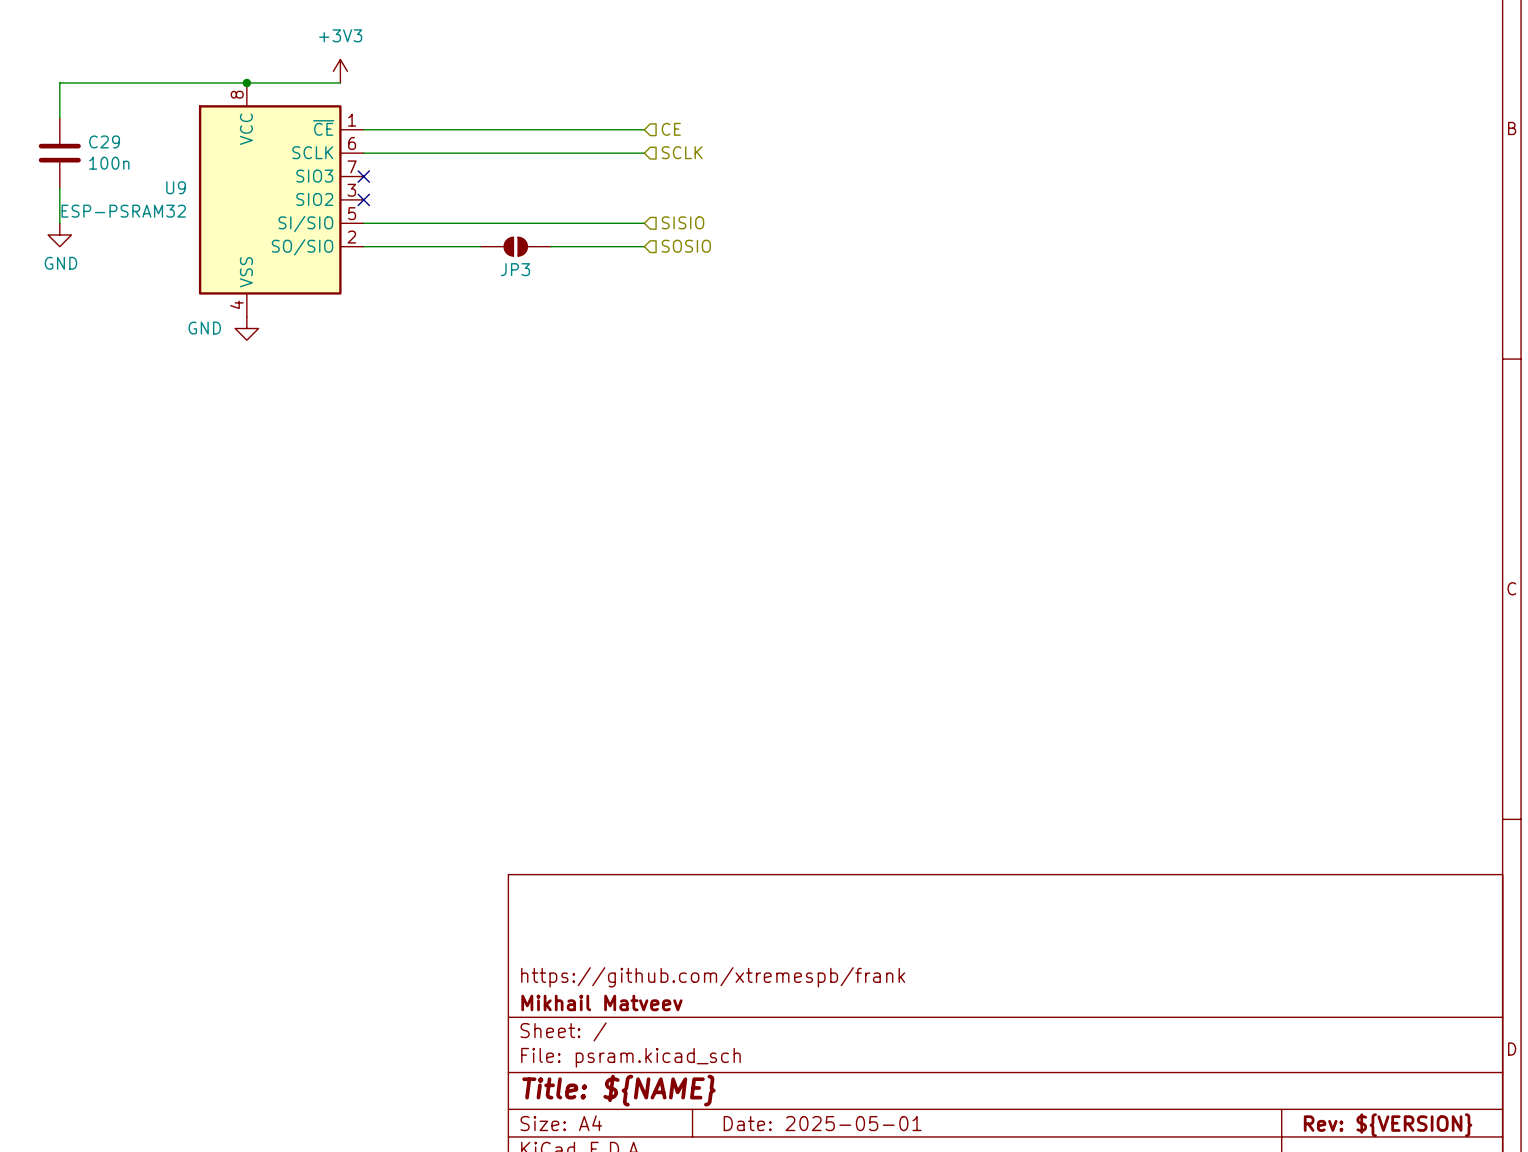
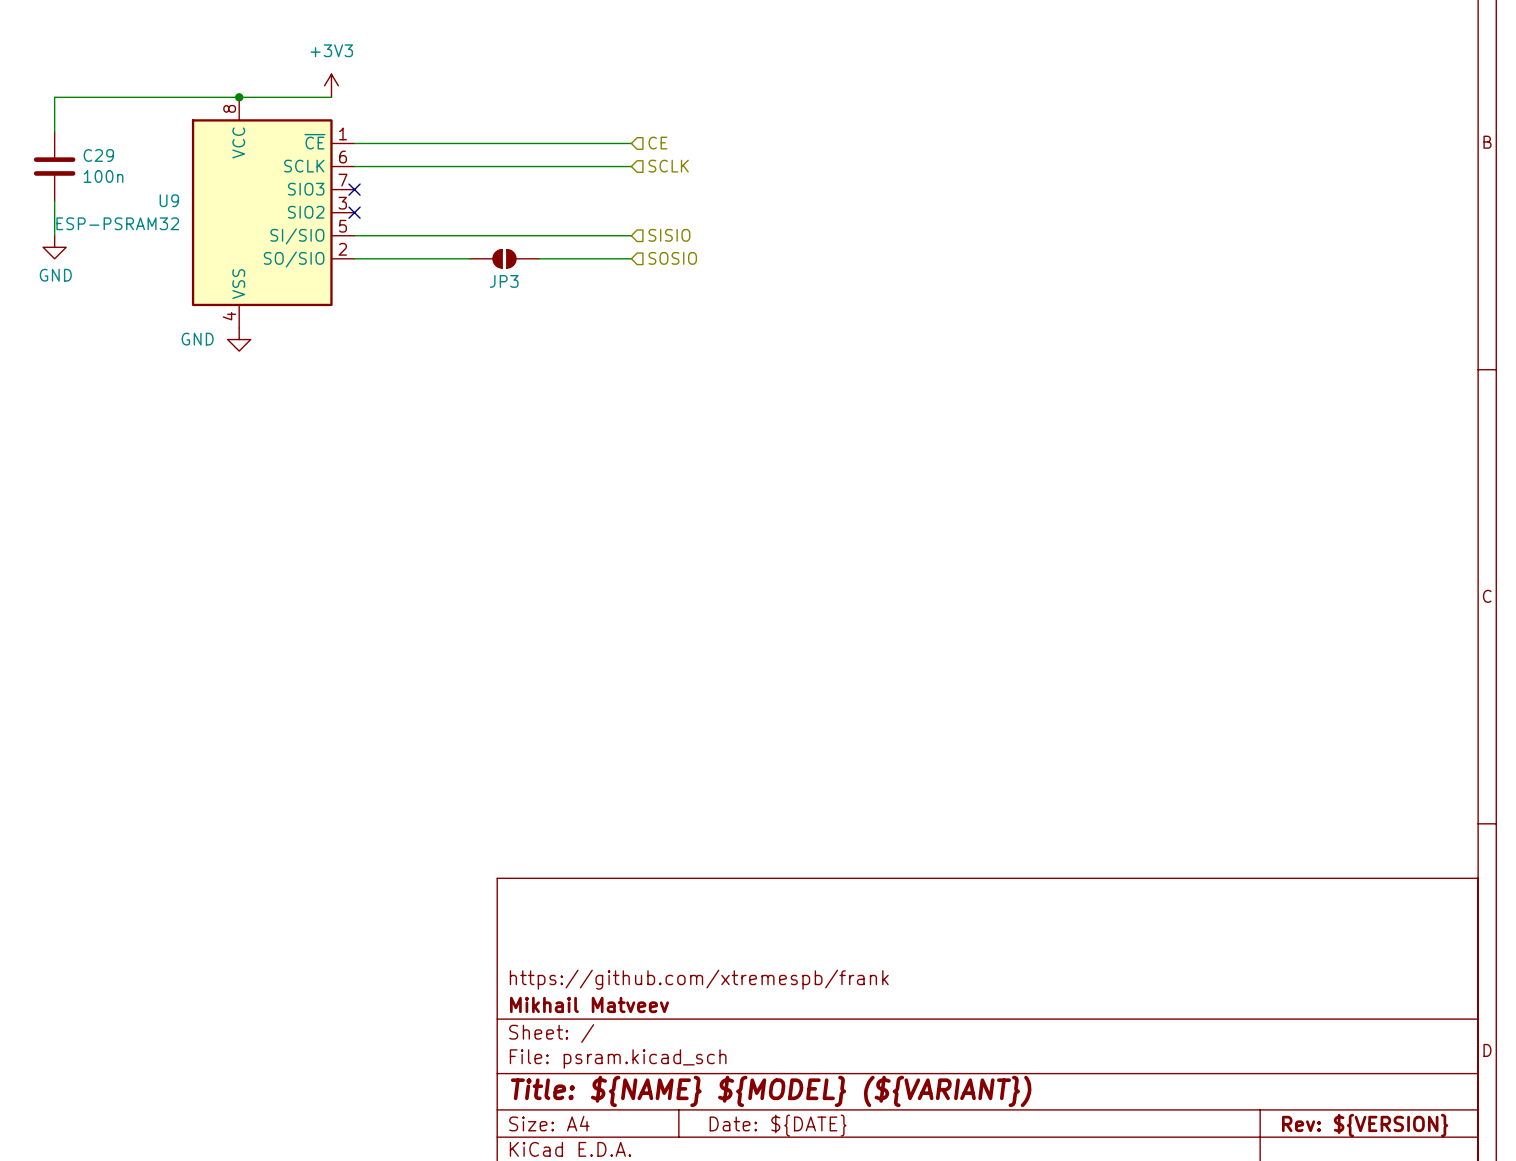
title block: Title: ${NAME} (618, 1090) -> Title: ${NAME} ${MODEL} (${VARIANT}) (771, 1091)
title block: Date: 2025-05-01 (822, 1123) -> Date: ${DATE} (778, 1125)

